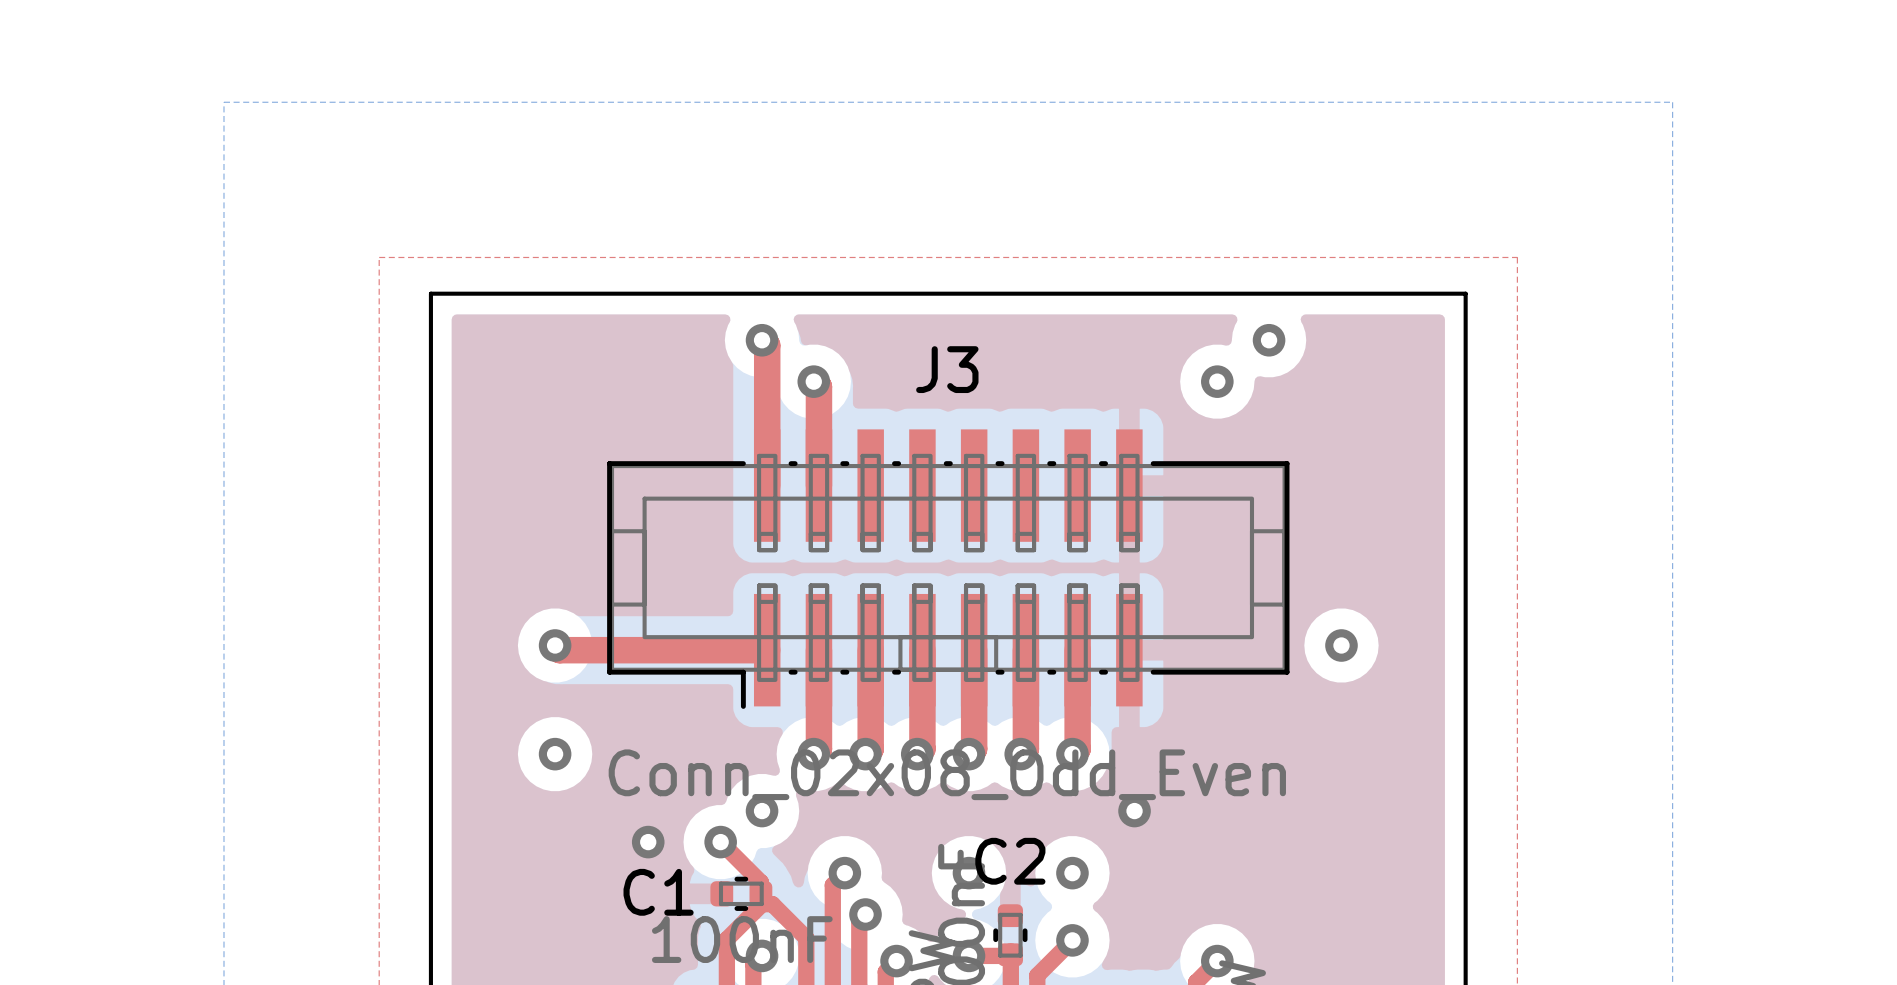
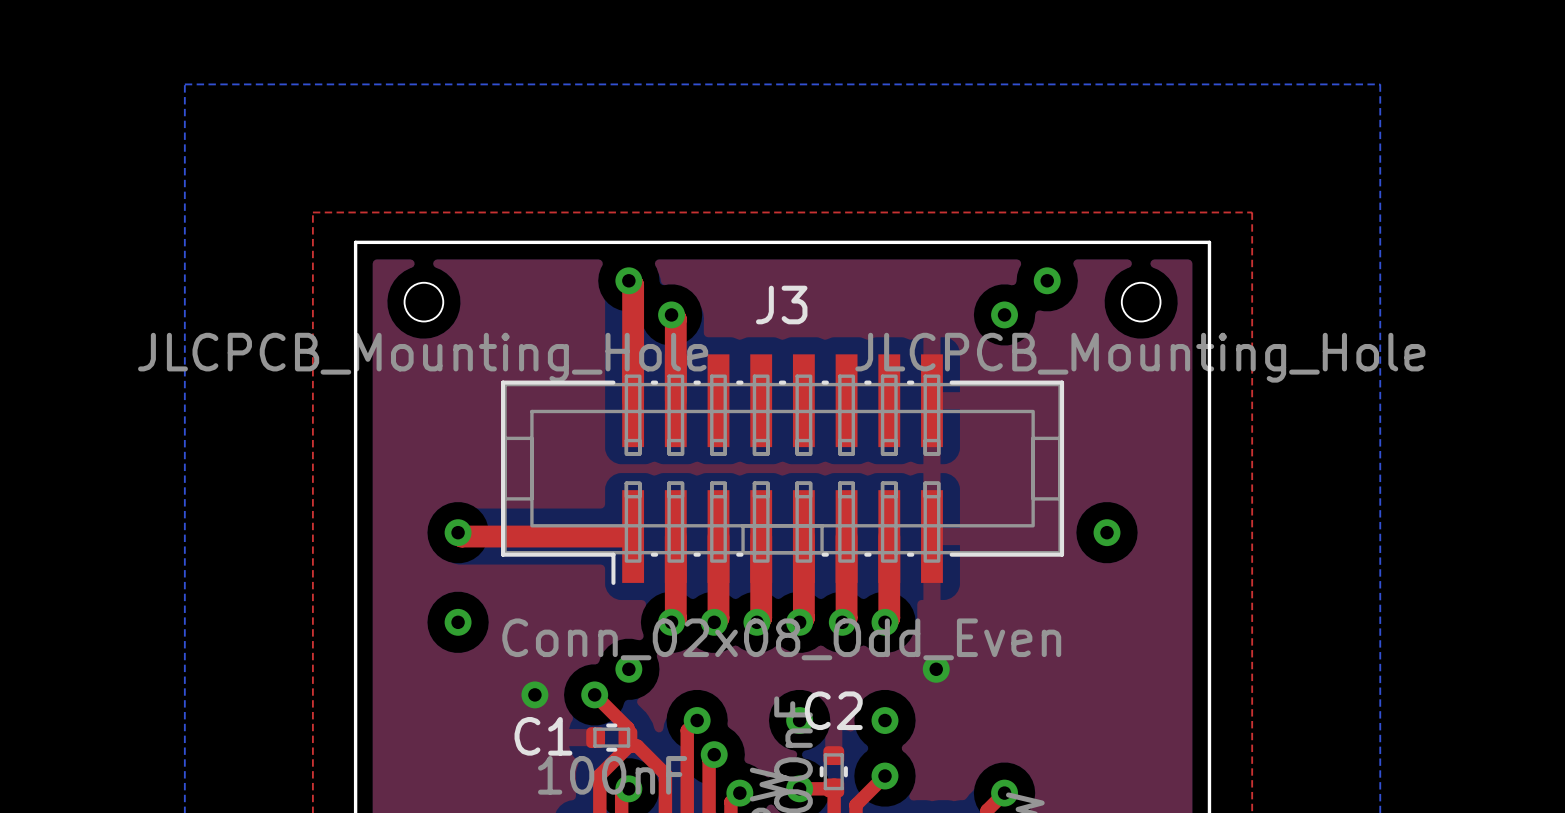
part: none -> JLCPCB_Mounting_Hole (423, 302)
part: none -> JLCPCB_Mounting_Hole (1141, 302)

